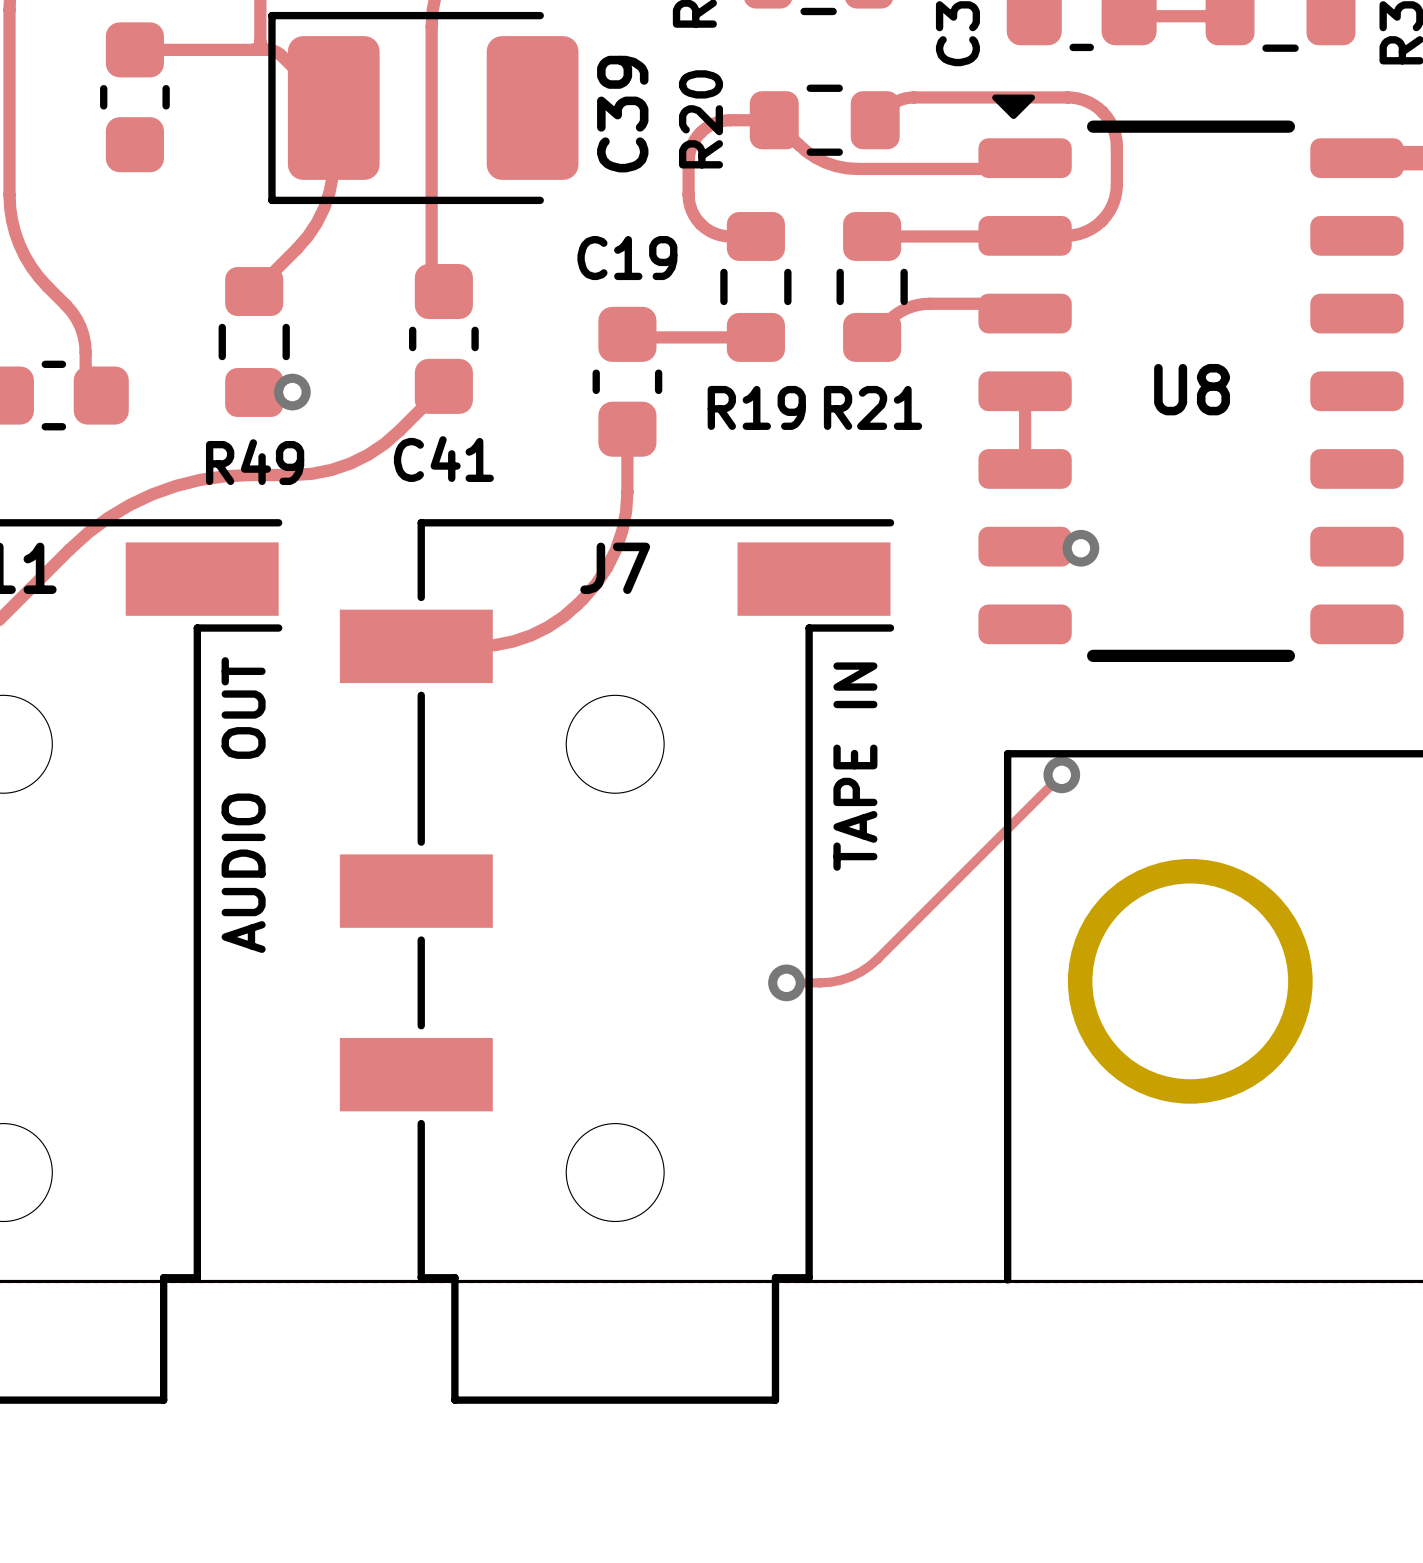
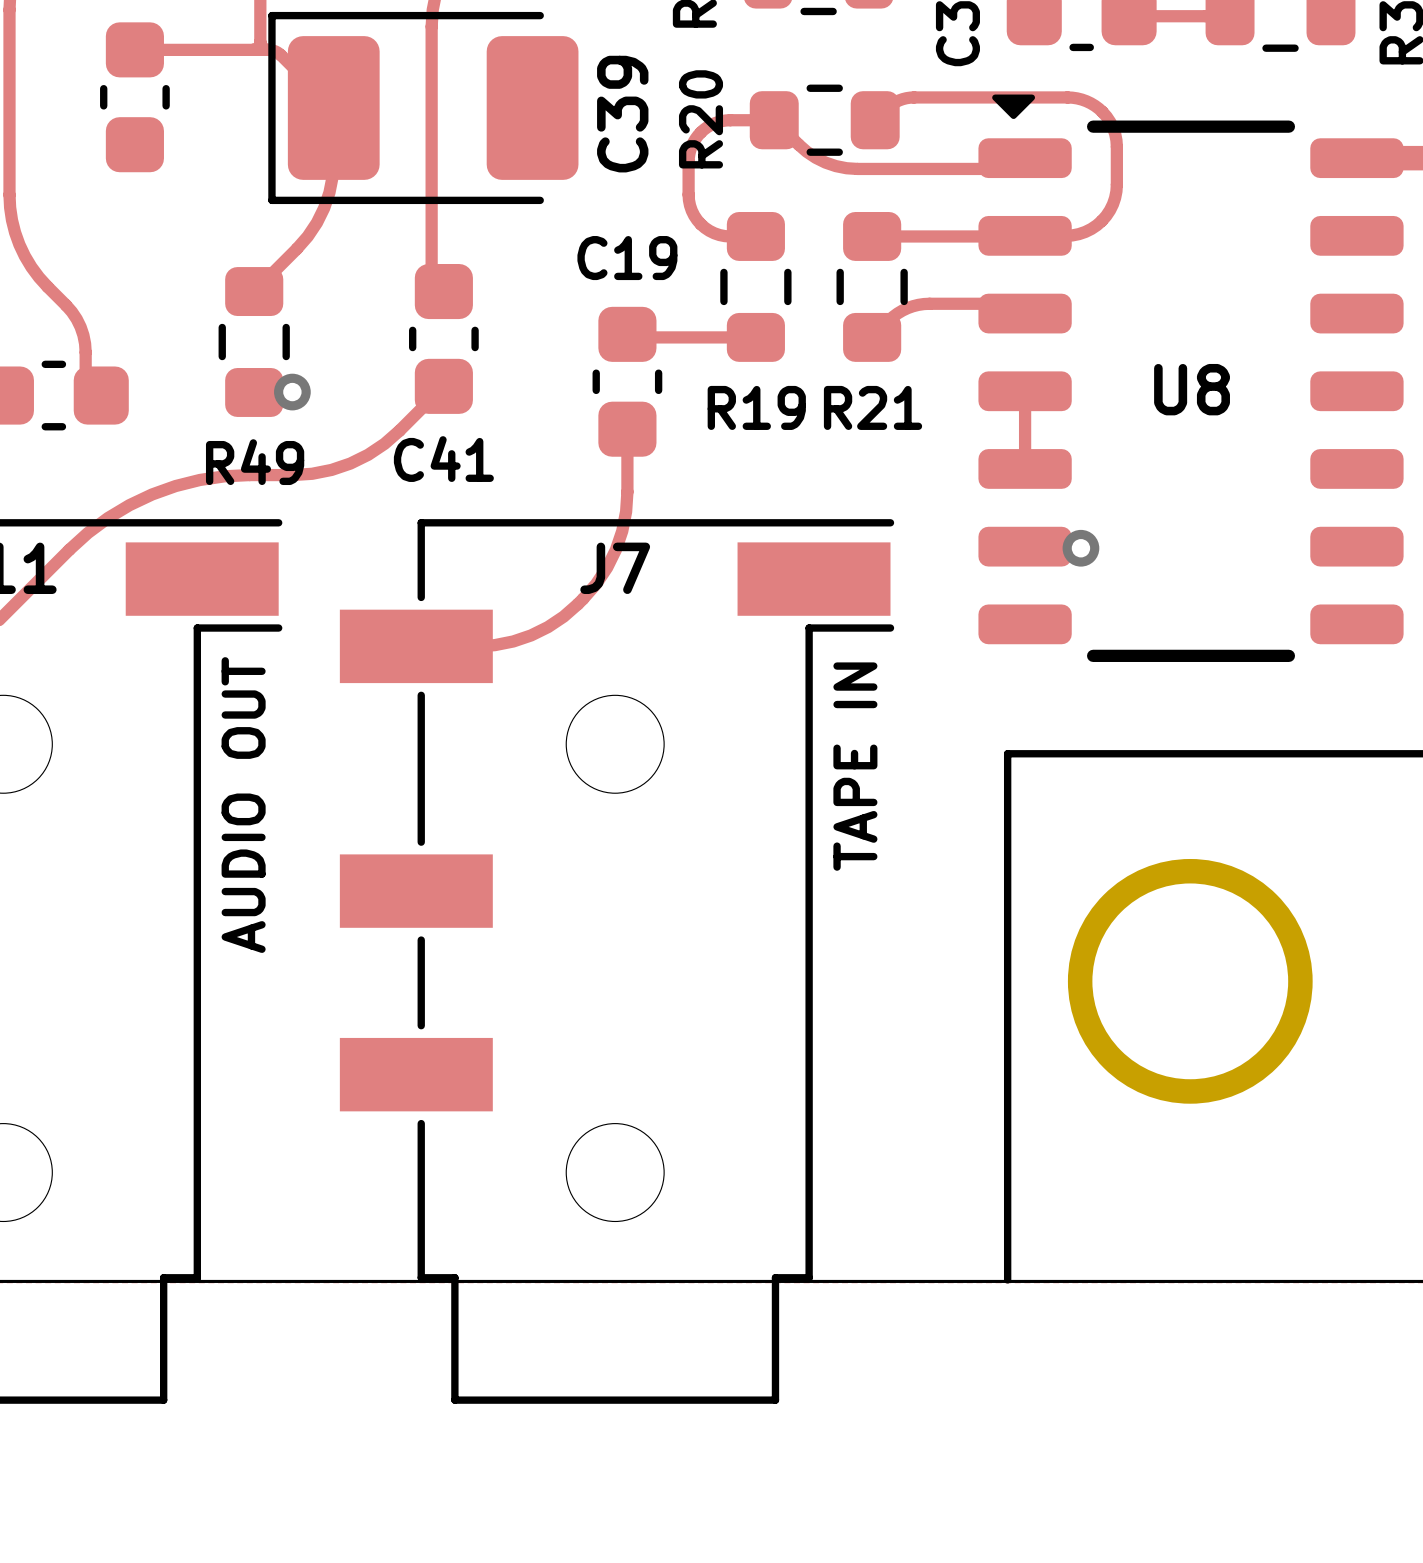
track: (1061, 774) (869, 966) (841, 980) (820, 982) (786, 982) -> none
via: (1061, 774) -> none
via: (786, 982) -> none

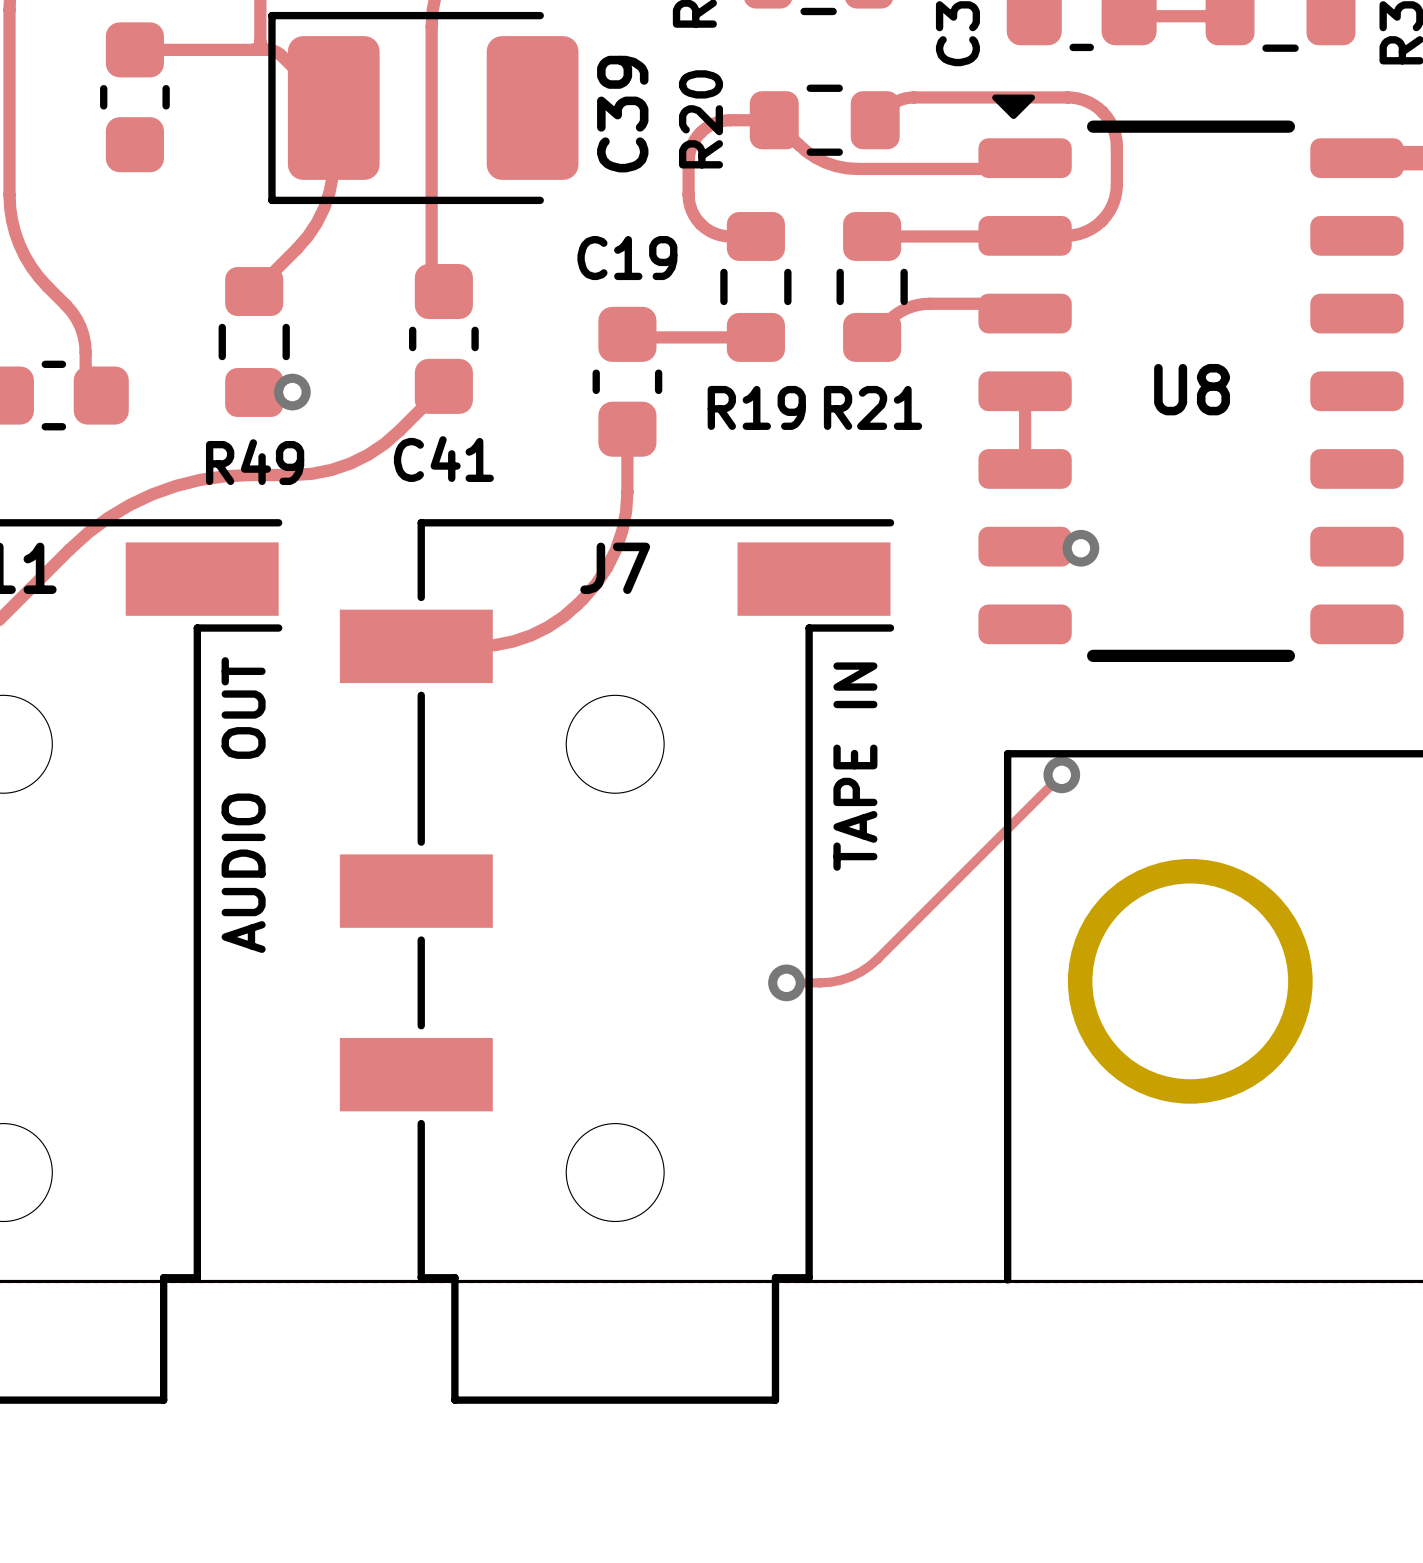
track: none -> (1061, 774) (869, 966) (841, 980) (820, 982) (786, 982)
via: none -> (1061, 774)
via: none -> (786, 982)

